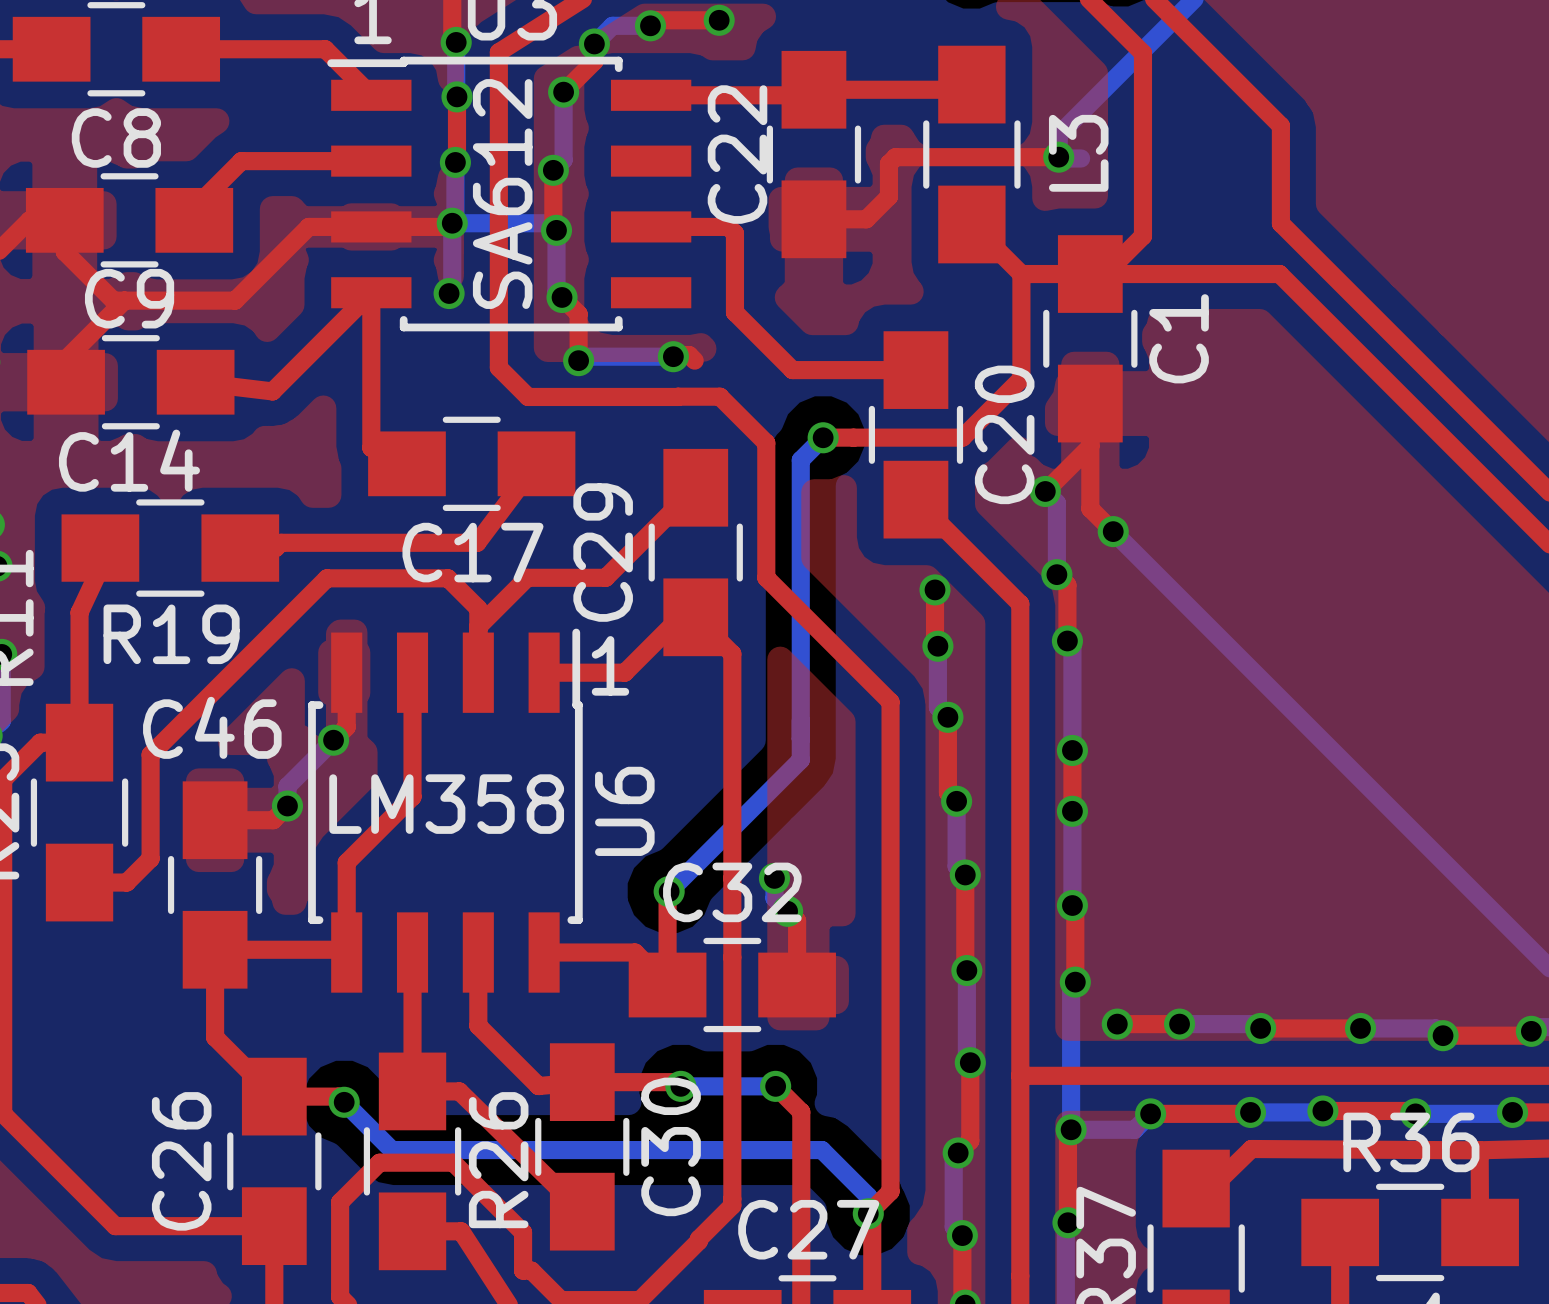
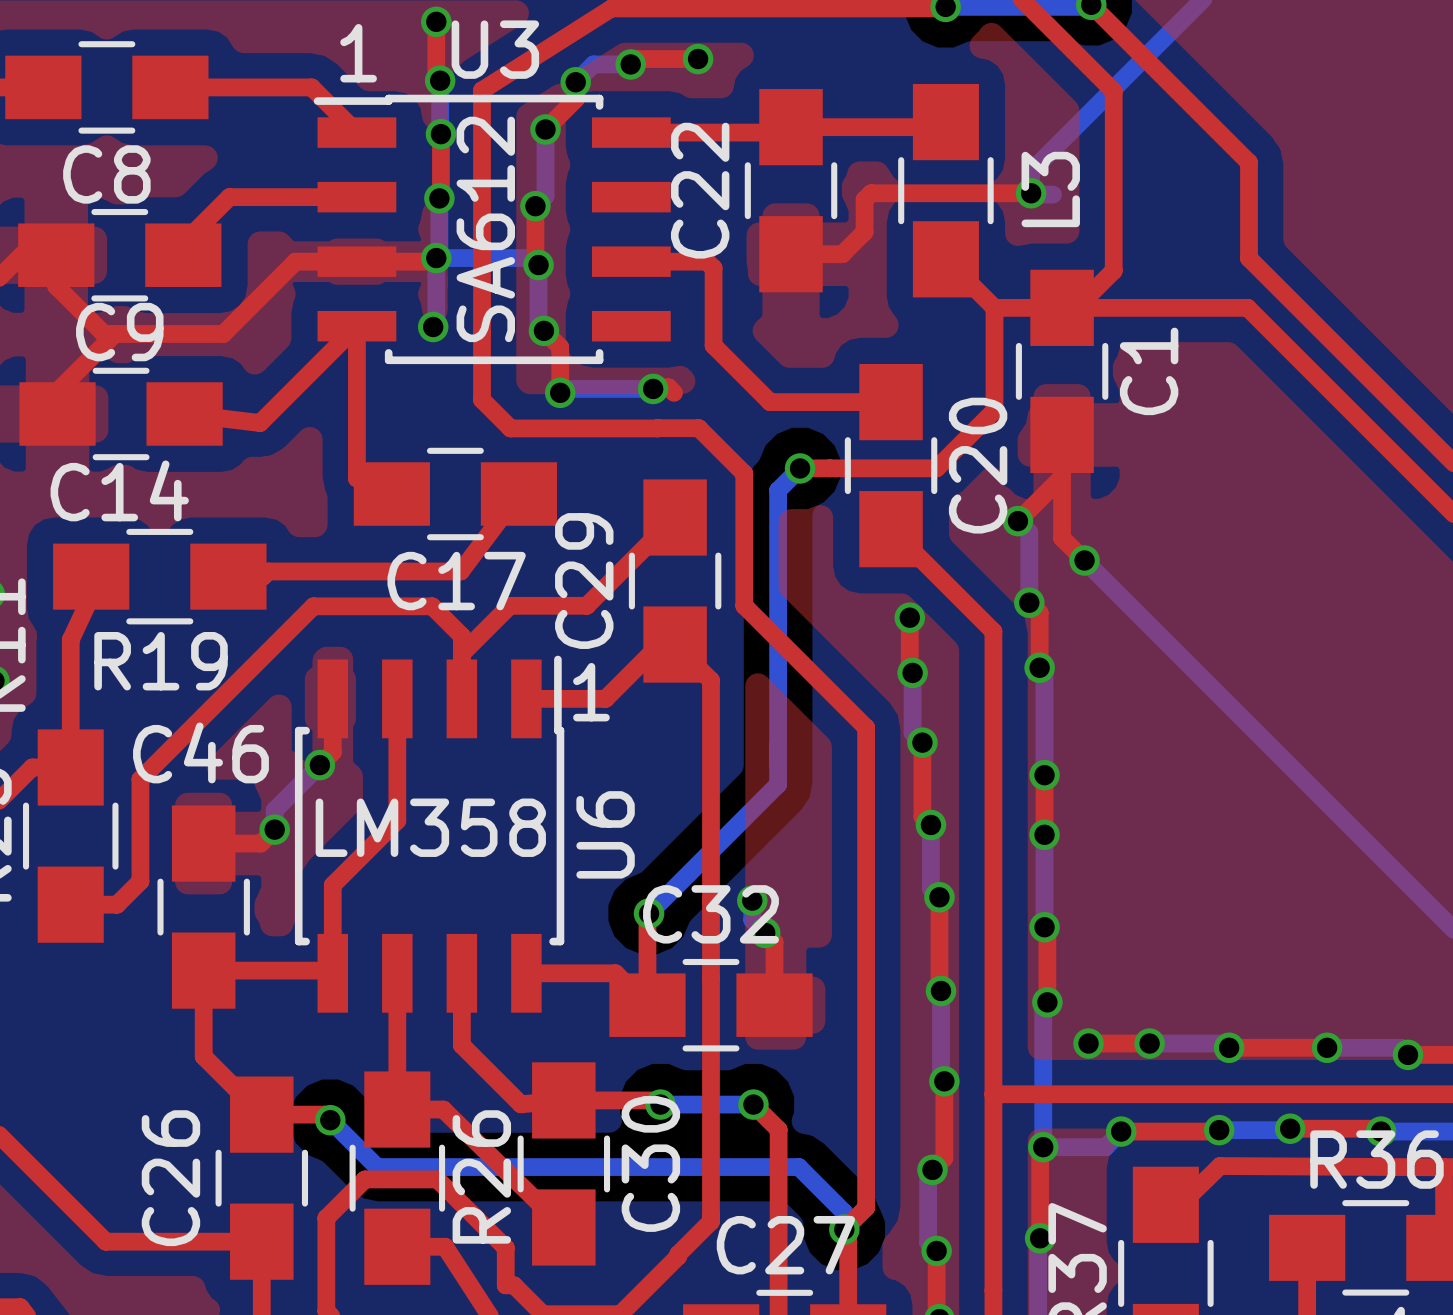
C22 name position: C22 (737, 154) -> C22 (700, 190)

